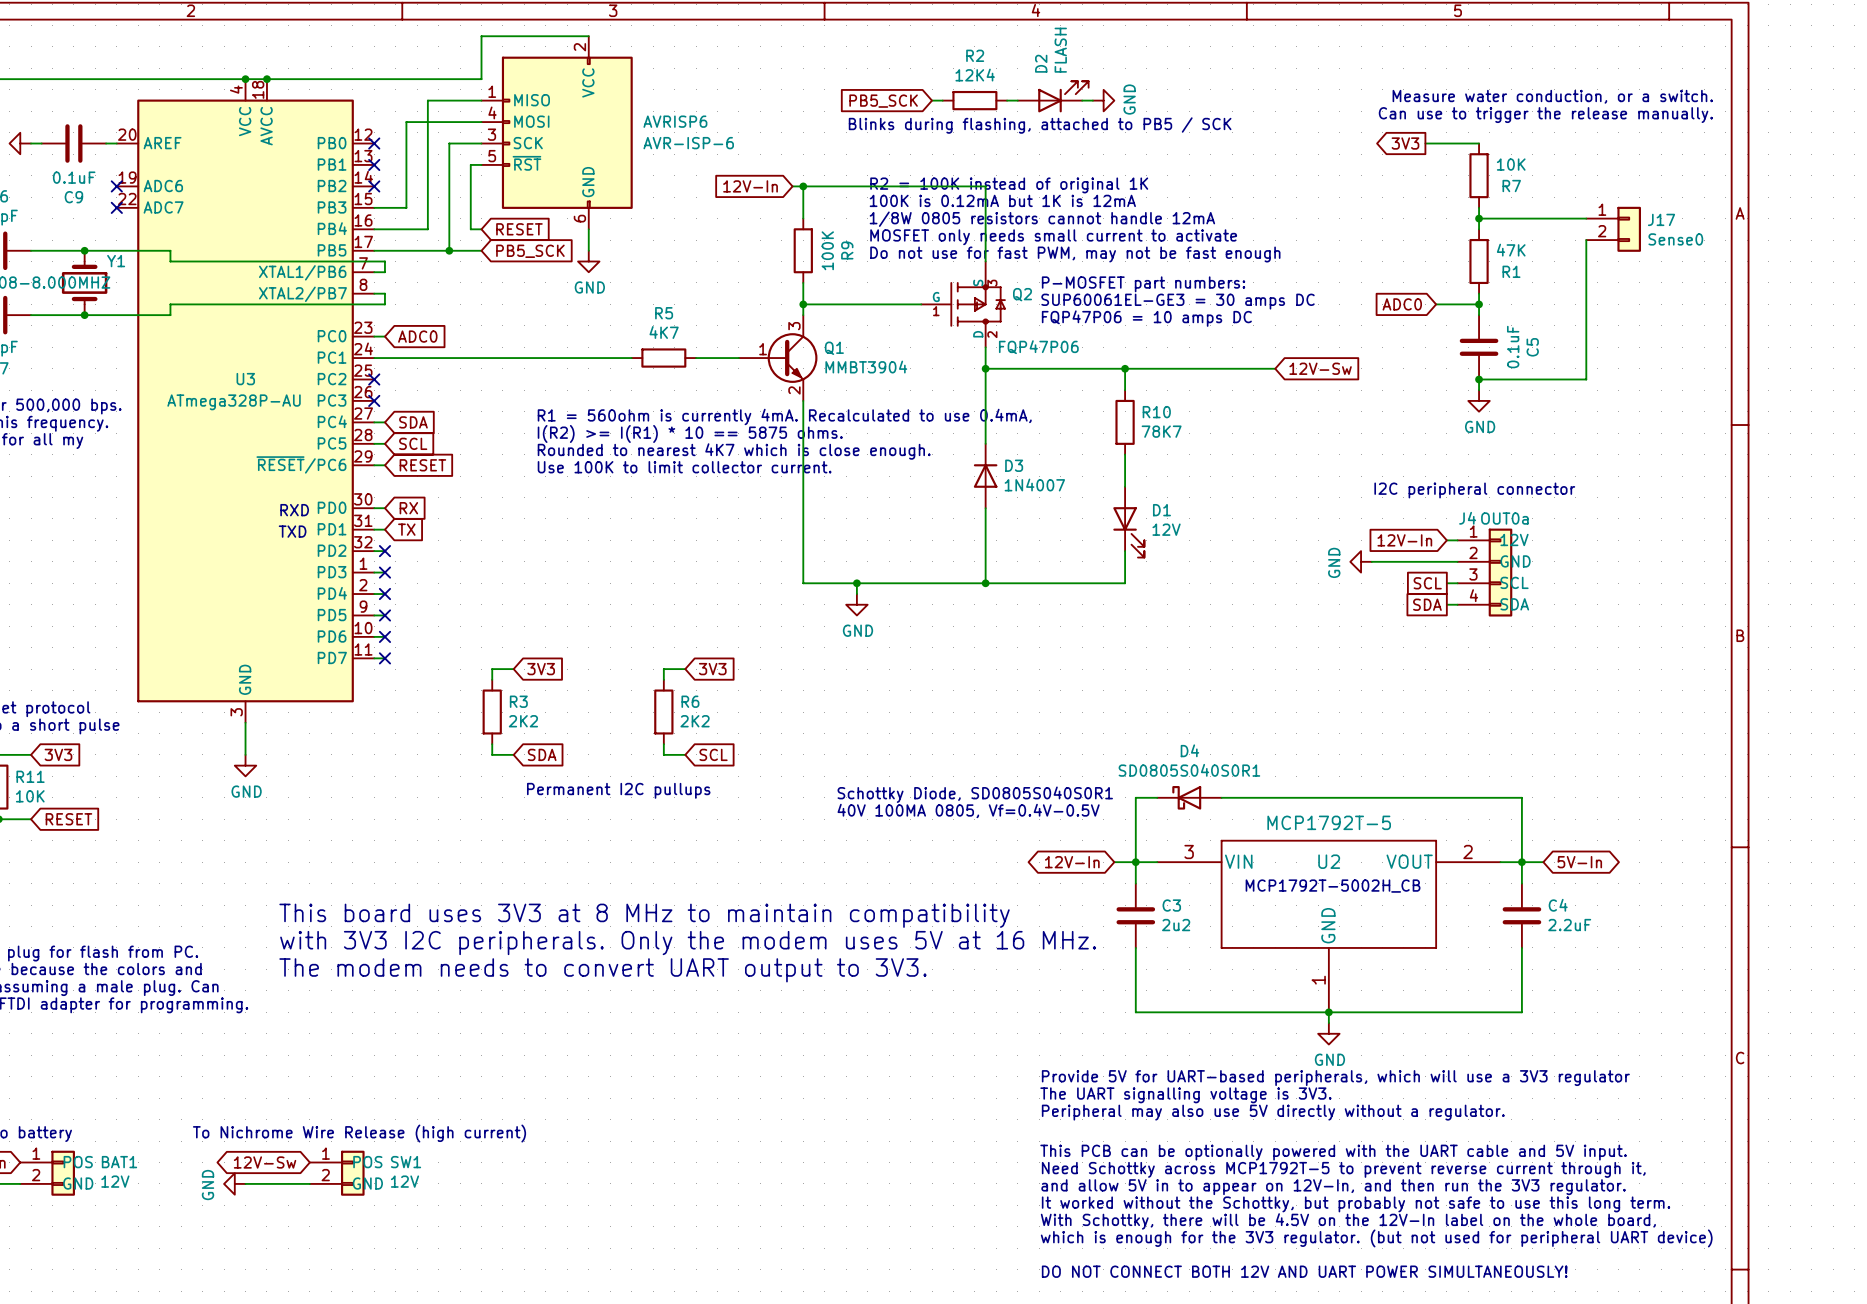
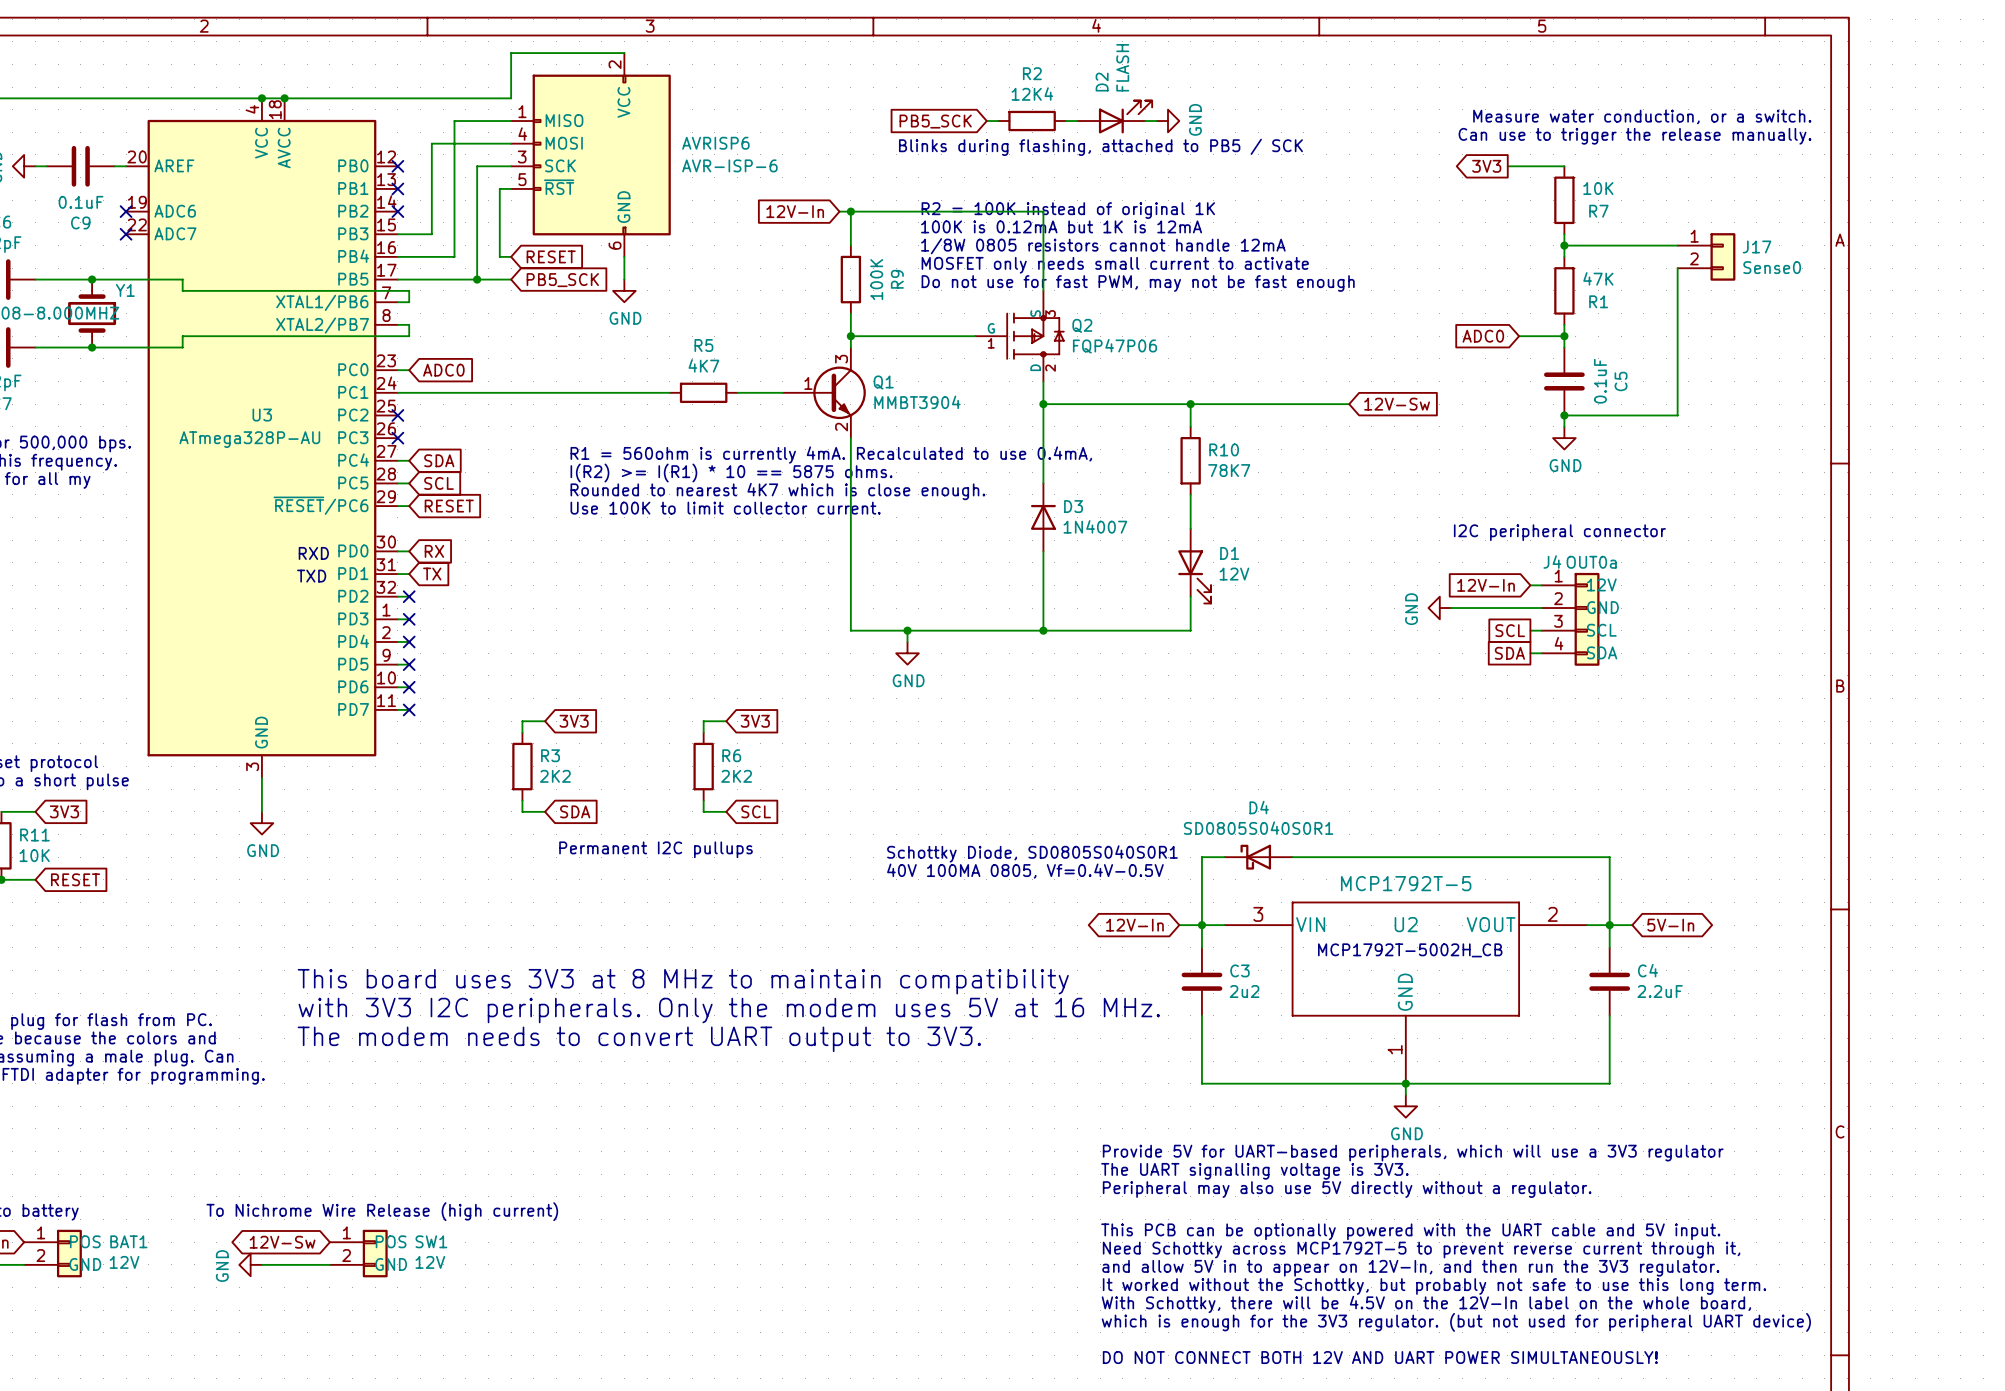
text: P-MOSFET part numbers: (1143, 284) -> none
text: SUP60061EL-GE3 = 30 amps DC (1178, 301) -> none
text: FQP47P06 = 10 amps DC (1146, 318) -> none
Q2 value position: FQP47P06 (1038, 347) -> FQP47P06 (1114, 346)

